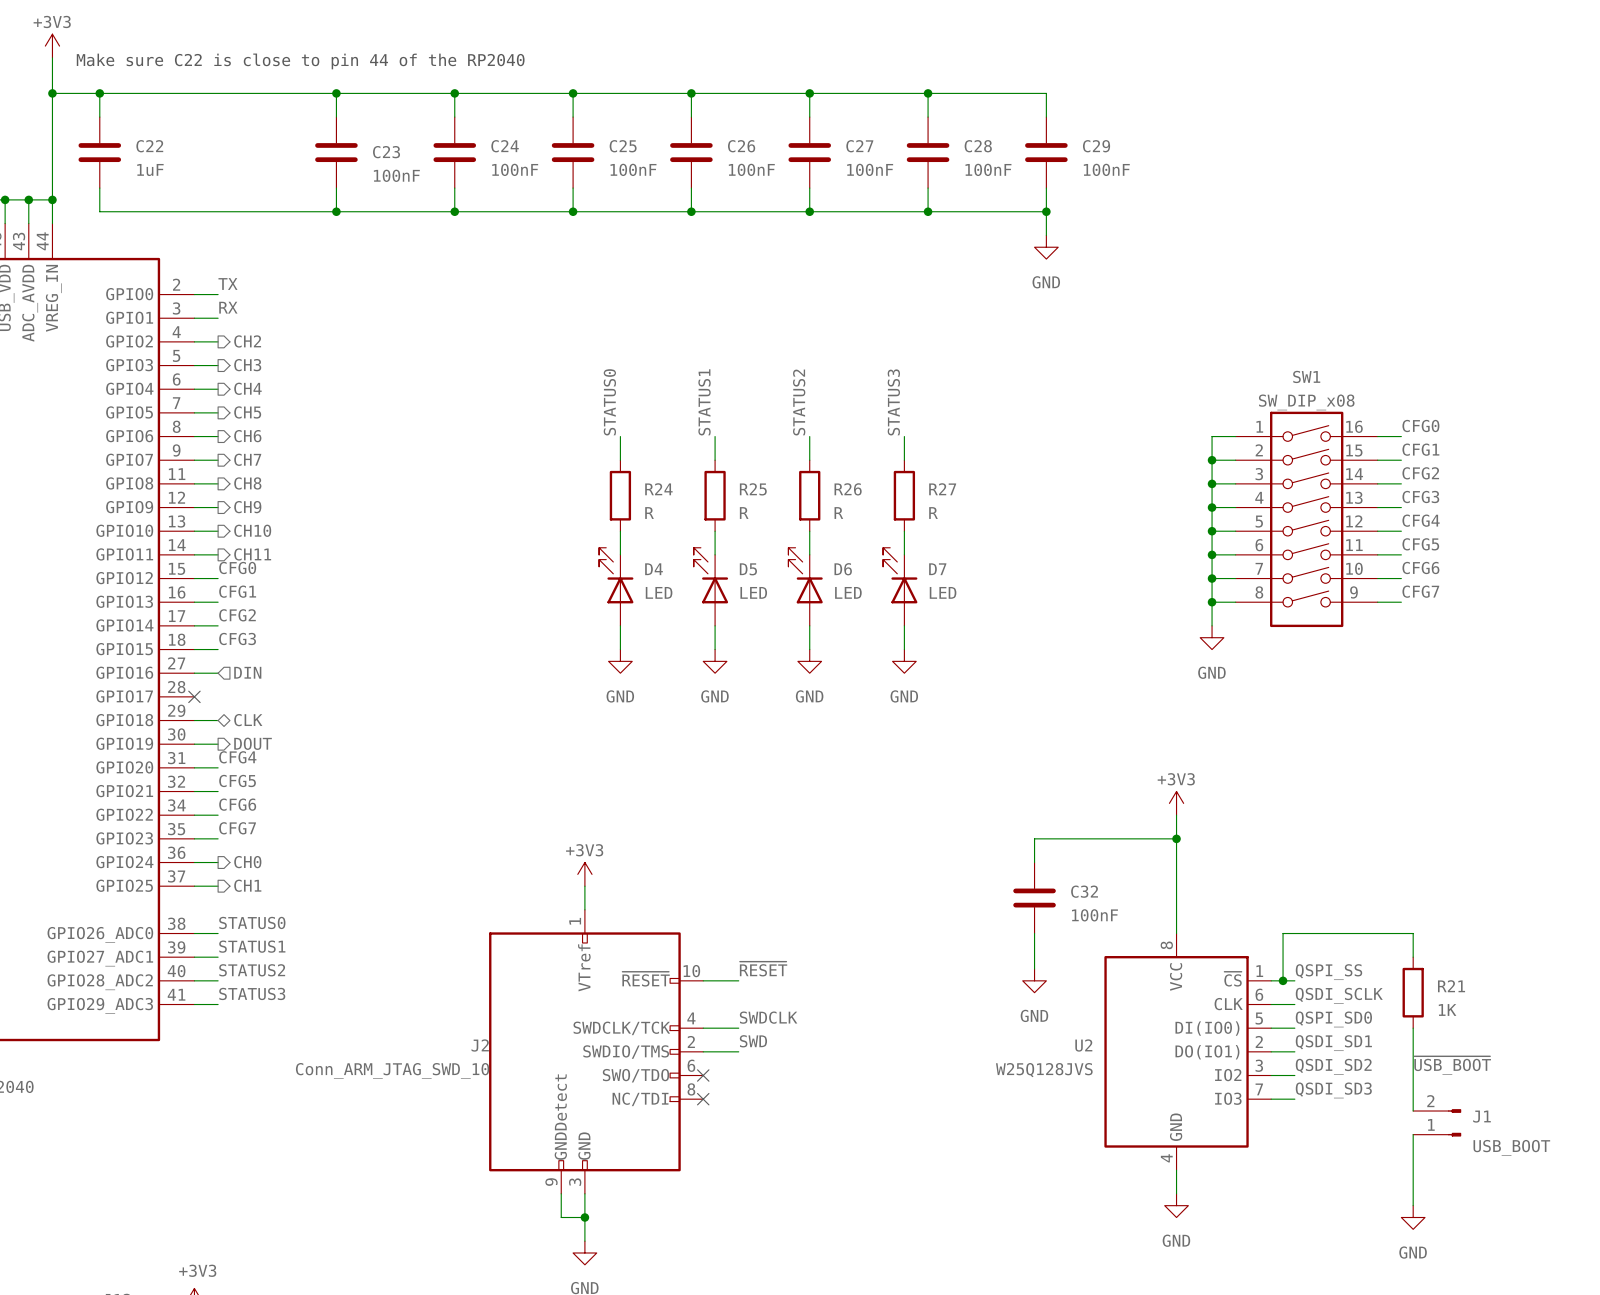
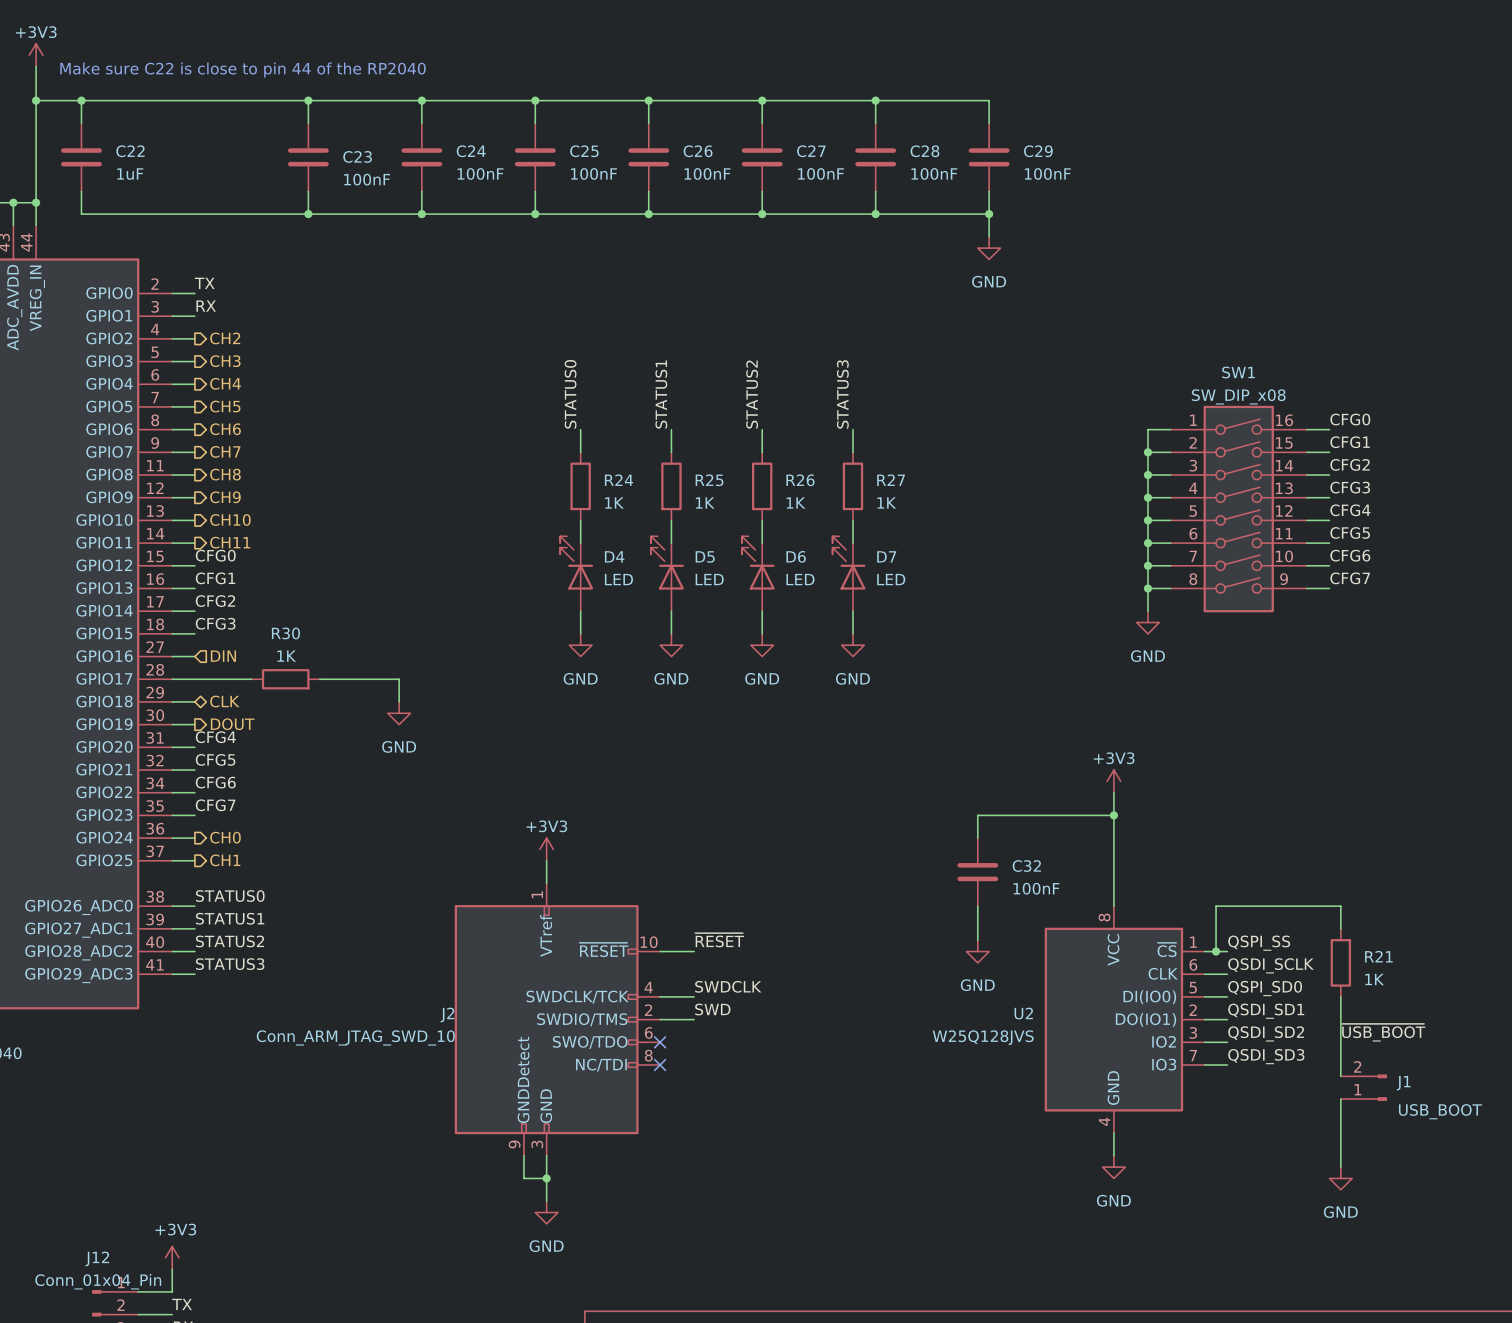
R24 value: R (649, 513) -> 1K (614, 502)
R25 value: R (744, 513) -> 1K (705, 502)
R26 value: R (838, 513) -> 1K (795, 502)
R27 value: R (933, 513) -> 1K (886, 502)
wire: none -> (172, 679) (251, 679)
no-connect mark: (194, 696) -> none
R30: none -> 1K (285, 679)
wire: none -> (319, 679) (399, 679) (399, 701)
power symbol: none -> GND (399, 713)

